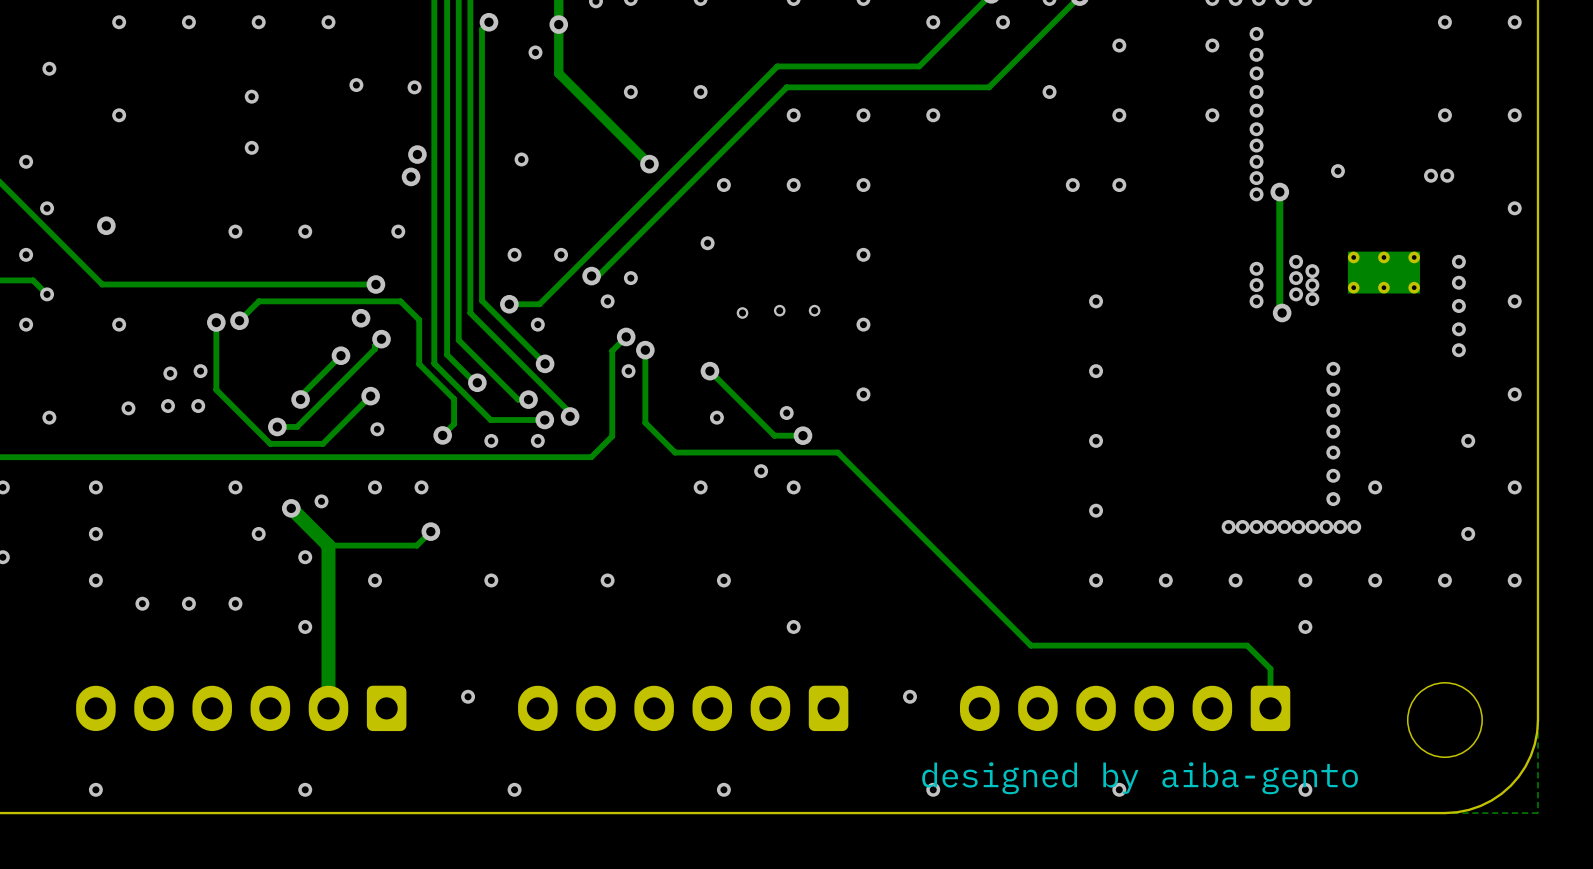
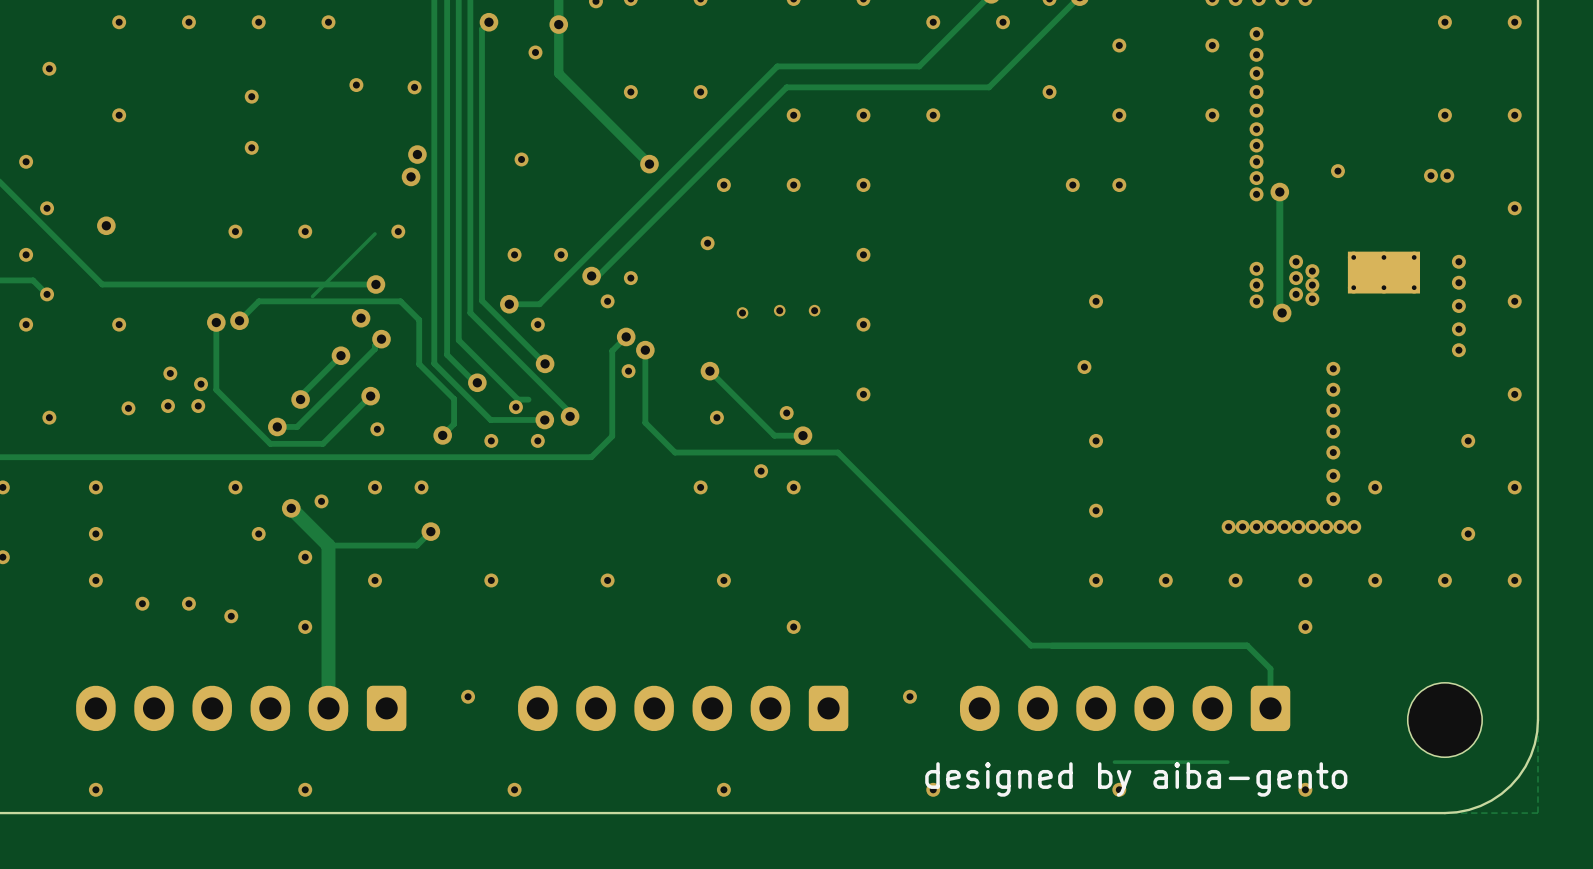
track: none -> (375, 233) (312, 296)
via position: (200, 371) -> (201, 384)
via position: (1096, 371) -> (1084, 367)
via position: (528, 399) -> (515, 407)
via position: (235, 603) -> (231, 616)
track: none -> (1227, 762) (1114, 762)

